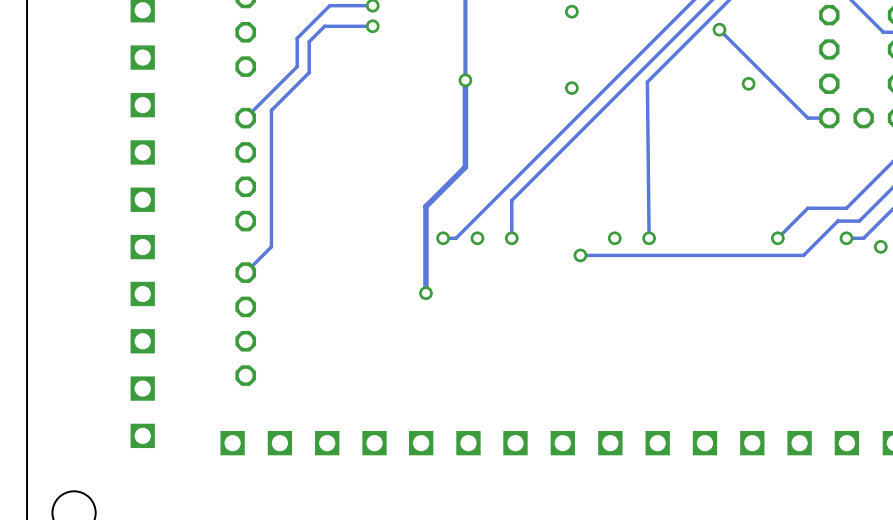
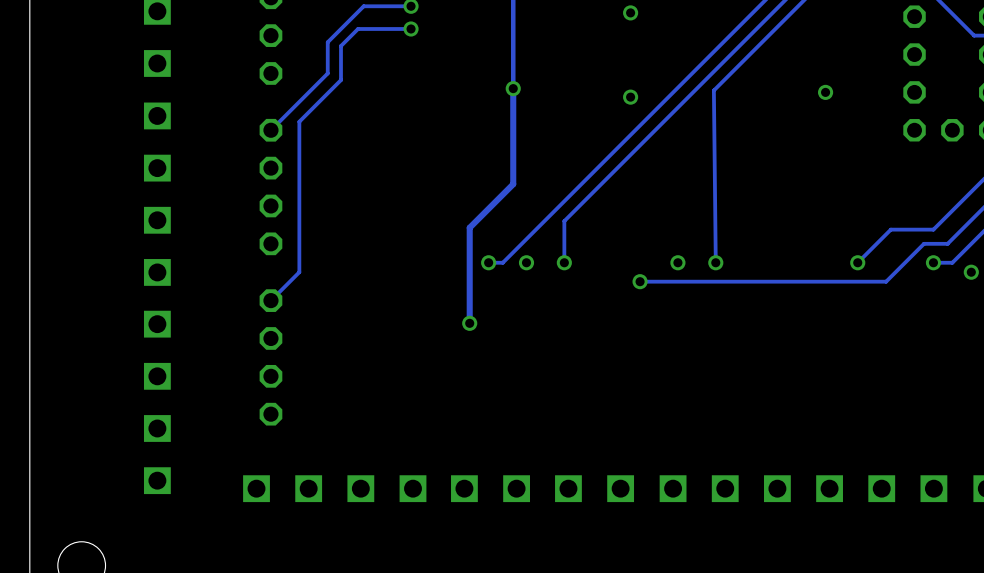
track: (719, 29) (807, 118) (829, 118) -> none
via: (719, 29) -> none

